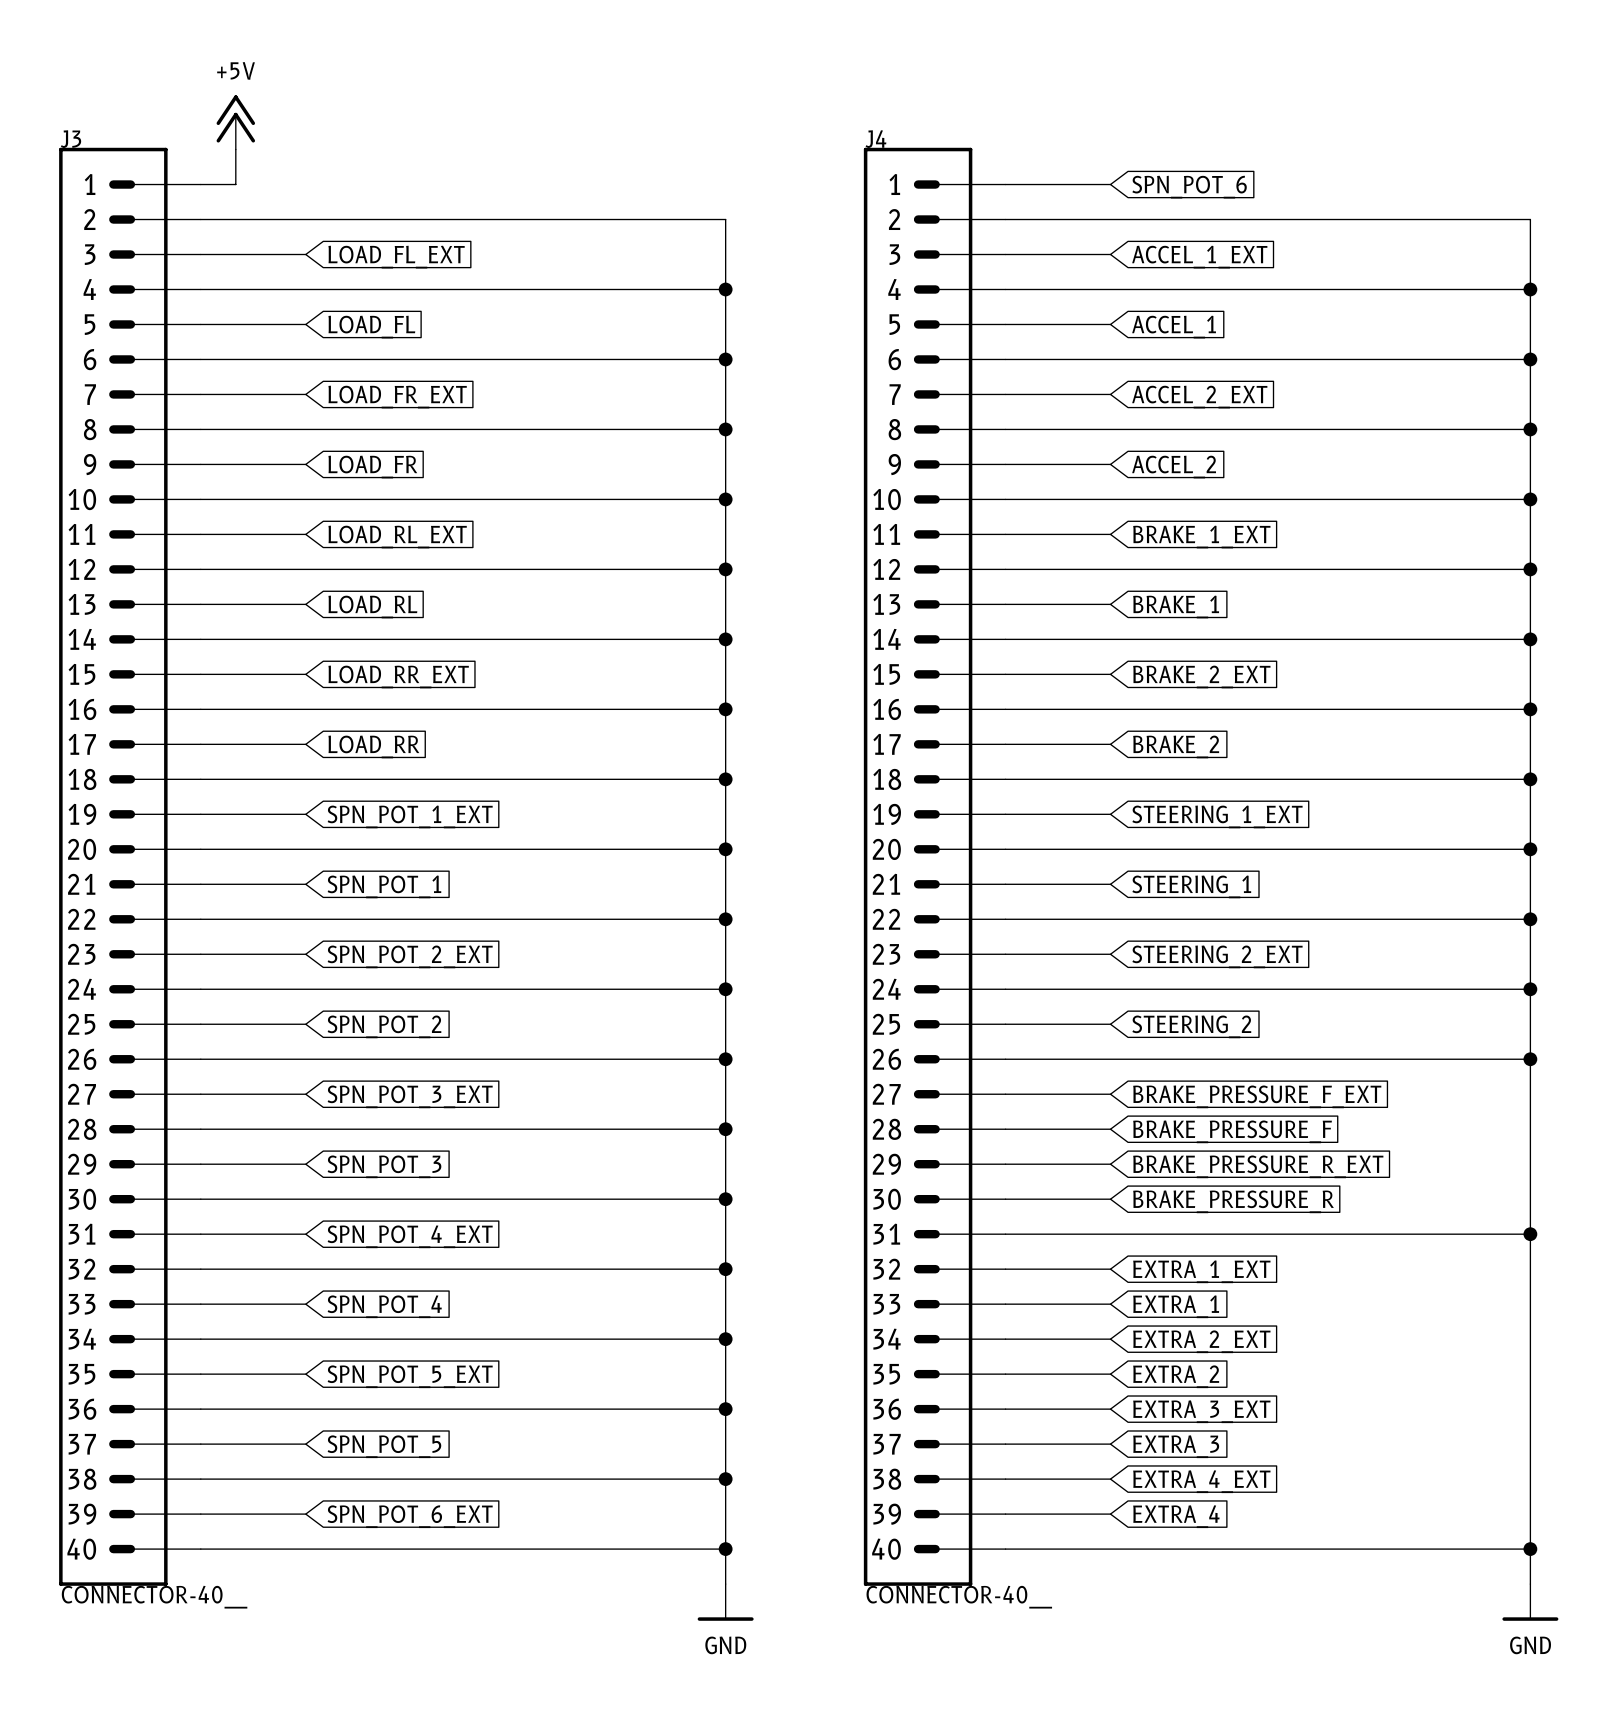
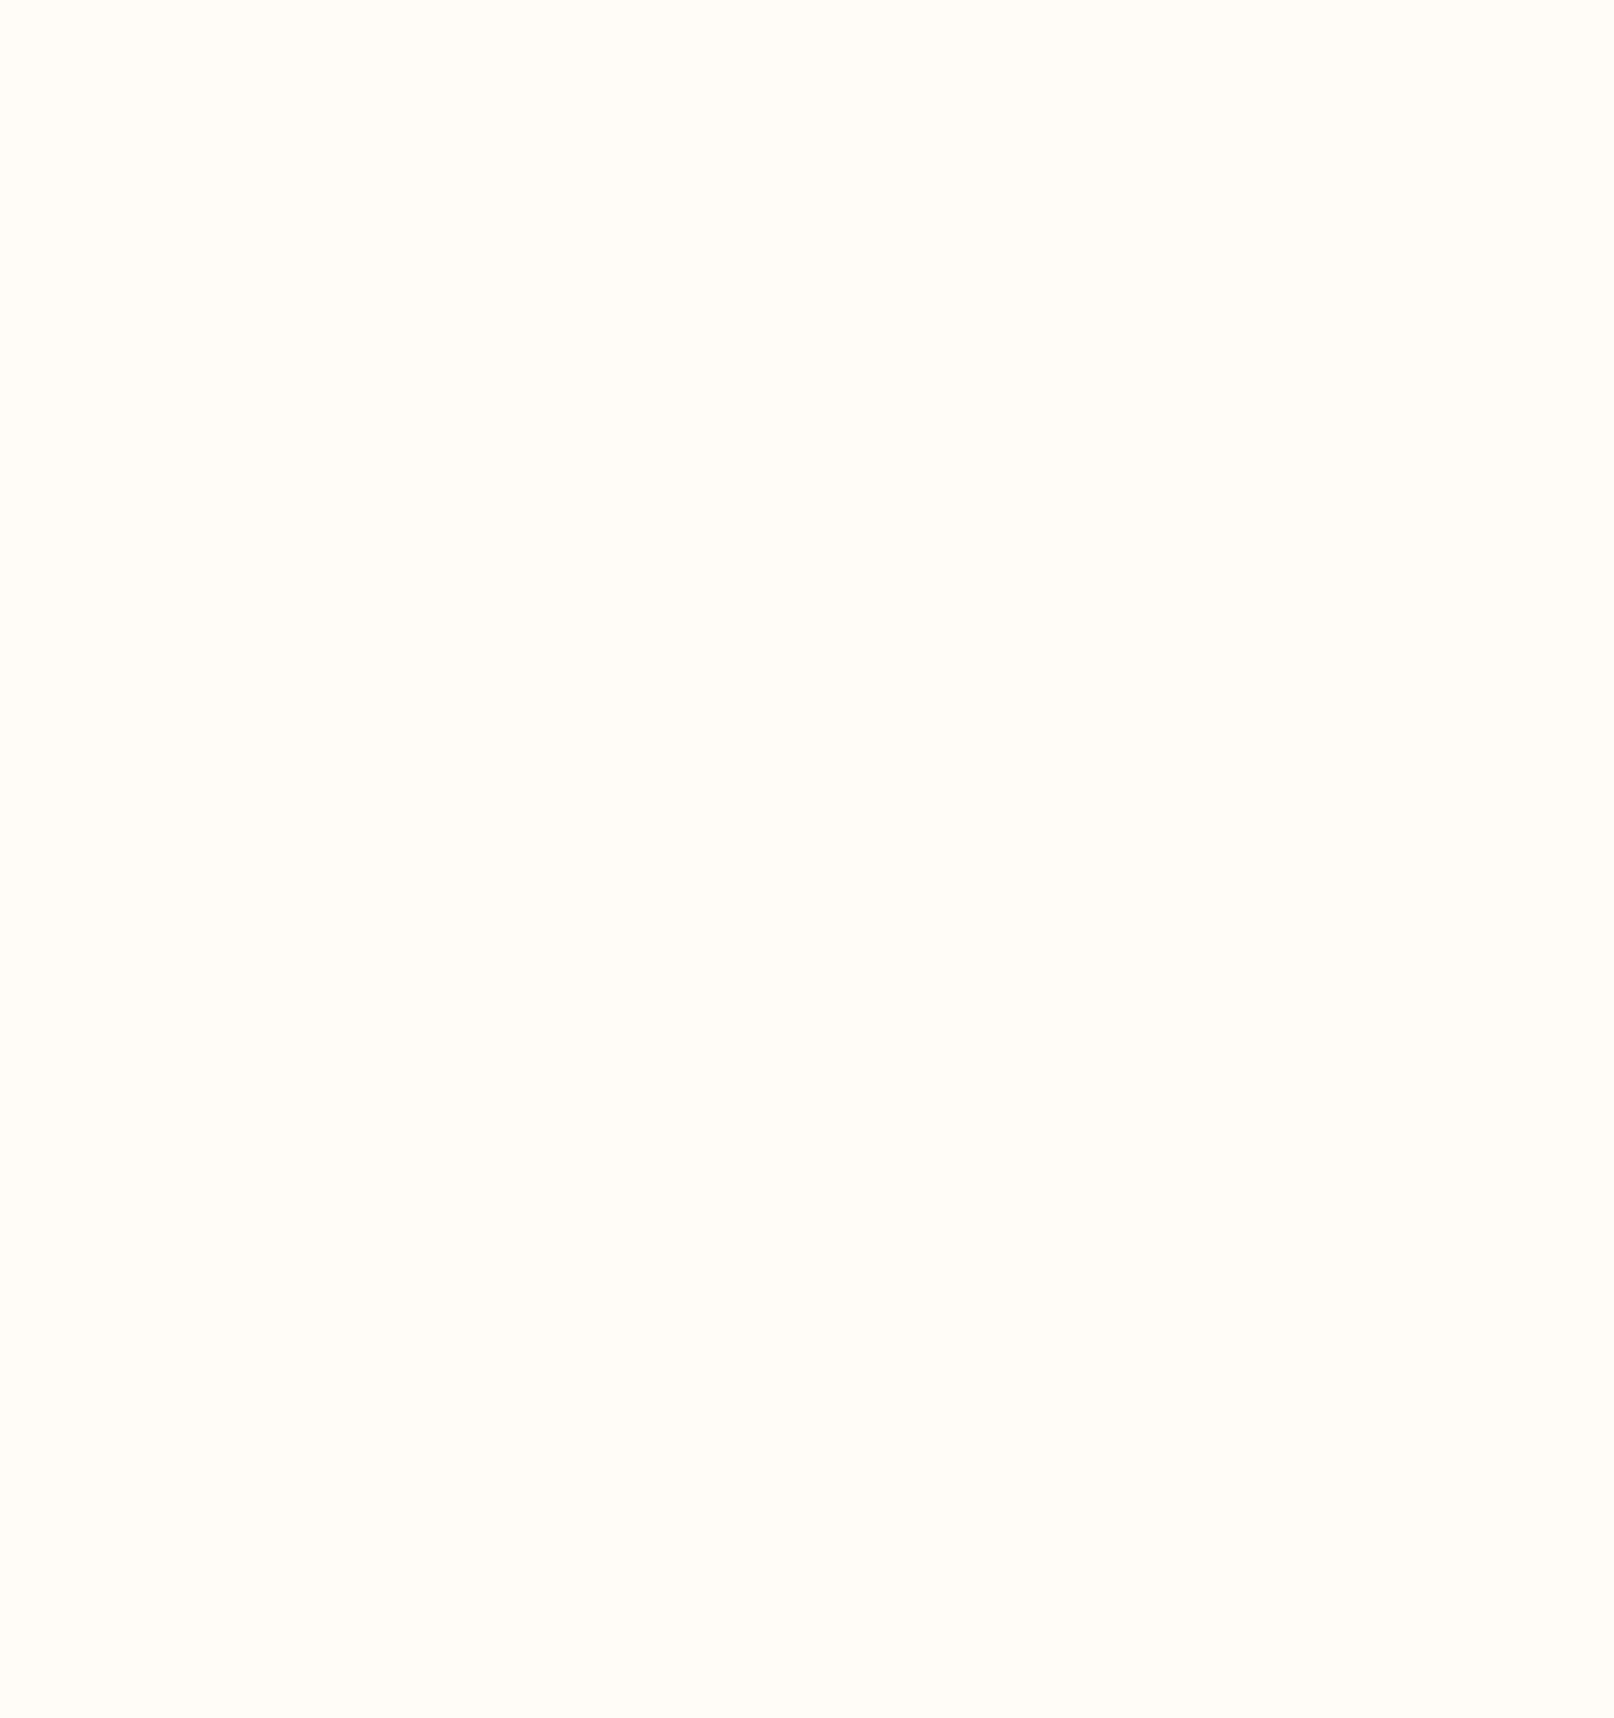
power symbol: +5V (235, 122) -> none
wire: (235, 149) (235, 184) (200, 184) -> none
wire: (1005, 184) (1110, 184) -> none
global label: SPN_POT_6 (1189, 187) -> none
wire: (200, 219) (725, 219) (725, 1584) -> none
wire: (1005, 219) (1530, 219) (1530, 1584) -> none
wire: (200, 254) (305, 254) -> none
wire: (1005, 254) (1110, 254) -> none
global label: LOAD_FL_EXT (396, 257) -> none
global label: ACCEL_1_EXT (1199, 257) -> none
wire: (200, 289) (725, 289) -> none
junction: (725, 289) -> none
wire: (1005, 289) (1530, 289) -> none
junction: (1530, 289) -> none
wire: (200, 324) (305, 324) -> none
wire: (1005, 324) (1110, 324) -> none
global label: LOAD_FL (371, 327) -> none
global label: ACCEL_1 (1174, 327) -> none
wire: (200, 359) (725, 359) -> none
junction: (725, 359) -> none
wire: (1005, 359) (1530, 359) -> none
junction: (1530, 359) -> none
wire: (200, 394) (305, 394) -> none
wire: (1005, 394) (1110, 394) -> none
global label: LOAD_FR_EXT (397, 397) -> none
global label: ACCEL_2_EXT (1199, 397) -> none
wire: (200, 429) (725, 429) -> none
junction: (725, 429) -> none
wire: (1005, 429) (1530, 429) -> none
junction: (1530, 429) -> none
wire: (200, 464) (305, 464) -> none
wire: (1005, 464) (1110, 464) -> none
global label: LOAD_FR (372, 467) -> none
global label: ACCEL_2 (1174, 467) -> none
wire: (200, 499) (725, 499) -> none
junction: (725, 499) -> none
wire: (1005, 499) (1530, 499) -> none
junction: (1530, 499) -> none
wire: (200, 534) (305, 534) -> none
wire: (1005, 534) (1110, 534) -> none
global label: LOAD_RL_EXT (397, 537) -> none
global label: BRAKE_1_EXT (1201, 537) -> none
wire: (200, 569) (725, 569) -> none
junction: (725, 569) -> none
wire: (1005, 569) (1530, 569) -> none
junction: (1530, 569) -> none
wire: (200, 604) (305, 604) -> none
wire: (1005, 604) (1110, 604) -> none
global label: LOAD_RL (372, 607) -> none
global label: BRAKE_1 (1176, 607) -> none
wire: (200, 639) (725, 639) -> none
junction: (725, 639) -> none
wire: (1005, 639) (1530, 639) -> none
junction: (1530, 639) -> none
wire: (200, 674) (305, 674) -> none
wire: (1005, 674) (1110, 674) -> none
global label: LOAD_RR_EXT (398, 676) -> none
global label: BRAKE_2_EXT (1201, 676) -> none
wire: (200, 709) (725, 709) -> none
junction: (725, 709) -> none
wire: (1005, 709) (1530, 709) -> none
junction: (1530, 709) -> none
wire: (200, 744) (305, 744) -> none
wire: (1005, 744) (1110, 744) -> none
global label: LOAD_RR (373, 746) -> none
global label: BRAKE_2 (1176, 746) -> none
wire: (200, 779) (725, 779) -> none
junction: (725, 779) -> none
wire: (1005, 779) (1530, 779) -> none
junction: (1530, 779) -> none
wire: (200, 814) (305, 814) -> none
wire: (1005, 814) (1110, 814) -> none
global label: SPN_POT_1_EXT (410, 816) -> none
global label: STEERING_1_EXT (1217, 816) -> none
wire: (200, 849) (725, 849) -> none
junction: (725, 849) -> none
wire: (1005, 849) (1530, 849) -> none
junction: (1530, 849) -> none
J3: CONNECTOR-40__ (129, 866) -> none
J4: CONNECTOR-40__ (934, 866) -> none
wire: (200, 884) (305, 884) -> none
wire: (1005, 884) (1110, 884) -> none
global label: SPN_POT_1 (384, 886) -> none
global label: STEERING_1 (1191, 886) -> none
wire: (200, 919) (725, 919) -> none
junction: (725, 919) -> none
wire: (1005, 919) (1530, 919) -> none
junction: (1530, 919) -> none
wire: (200, 954) (305, 954) -> none
wire: (1005, 954) (1110, 954) -> none
global label: SPN_POT_2_EXT (410, 956) -> none
global label: STEERING_2_EXT (1217, 956) -> none
wire: (200, 989) (725, 989) -> none
junction: (725, 989) -> none
wire: (1005, 989) (1530, 989) -> none
junction: (1530, 989) -> none
wire: (200, 1024) (305, 1024) -> none
wire: (1005, 1024) (1110, 1024) -> none
global label: SPN_POT_2 (384, 1026) -> none
global label: STEERING_2 (1191, 1026) -> none
wire: (200, 1059) (725, 1059) -> none
junction: (725, 1059) -> none
wire: (1005, 1059) (1530, 1059) -> none
junction: (1530, 1059) -> none
wire: (200, 1094) (305, 1094) -> none
wire: (1005, 1094) (1110, 1094) -> none
global label: SPN_POT_3_EXT (410, 1096) -> none
global label: BRAKE_PRESSURE_F_EXT (1257, 1096) -> none
wire: (200, 1129) (725, 1129) -> none
junction: (725, 1129) -> none
wire: (1005, 1129) (1110, 1129) -> none
global label: BRAKE_PRESSURE_F (1232, 1131) -> none
wire: (200, 1164) (305, 1164) -> none
wire: (1005, 1164) (1110, 1164) -> none
global label: SPN_POT_3 (384, 1166) -> none
global label: BRAKE_PRESSURE_R_EXT (1258, 1166) -> none
wire: (200, 1199) (725, 1199) -> none
junction: (725, 1199) -> none
wire: (1005, 1199) (1110, 1199) -> none
global label: BRAKE_PRESSURE_R (1233, 1201) -> none
wire: (200, 1234) (305, 1234) -> none
wire: (1005, 1234) (1530, 1234) -> none
junction: (1530, 1234) -> none
global label: SPN_POT_4_EXT (410, 1236) -> none
wire: (200, 1269) (725, 1269) -> none
junction: (725, 1269) -> none
wire: (1005, 1269) (1110, 1269) -> none
global label: EXTRA_1_EXT (1201, 1271) -> none
wire: (200, 1304) (305, 1304) -> none
wire: (1005, 1304) (1110, 1304) -> none
global label: SPN_POT_4 (384, 1306) -> none
global label: EXTRA_1 (1176, 1306) -> none
wire: (200, 1339) (725, 1339) -> none
junction: (725, 1339) -> none
wire: (1005, 1339) (1110, 1339) -> none
global label: EXTRA_2_EXT (1201, 1341) -> none
wire: (200, 1374) (305, 1374) -> none
wire: (1005, 1374) (1110, 1374) -> none
global label: SPN_POT_5_EXT (410, 1376) -> none
global label: EXTRA_2 (1176, 1376) -> none
wire: (200, 1409) (725, 1409) -> none
junction: (725, 1409) -> none
wire: (1005, 1409) (1110, 1409) -> none
global label: EXTRA_3_EXT (1201, 1411) -> none
wire: (200, 1444) (305, 1444) -> none
wire: (1005, 1444) (1110, 1444) -> none
global label: SPN_POT_5 (384, 1446) -> none
global label: EXTRA_3 (1176, 1446) -> none
wire: (200, 1479) (725, 1479) -> none
junction: (725, 1479) -> none
wire: (1005, 1479) (1110, 1479) -> none
global label: EXTRA_4_EXT (1201, 1481) -> none
wire: (200, 1514) (305, 1514) -> none
wire: (1005, 1514) (1110, 1514) -> none
global label: SPN_POT_6_EXT (410, 1516) -> none
global label: EXTRA_4 (1176, 1516) -> none
wire: (200, 1549) (725, 1549) -> none
junction: (725, 1549) -> none
wire: (1005, 1549) (1530, 1549) -> none
junction: (1530, 1549) -> none
power symbol: GND (725, 1602) -> none
power symbol: GND (1530, 1602) -> none

